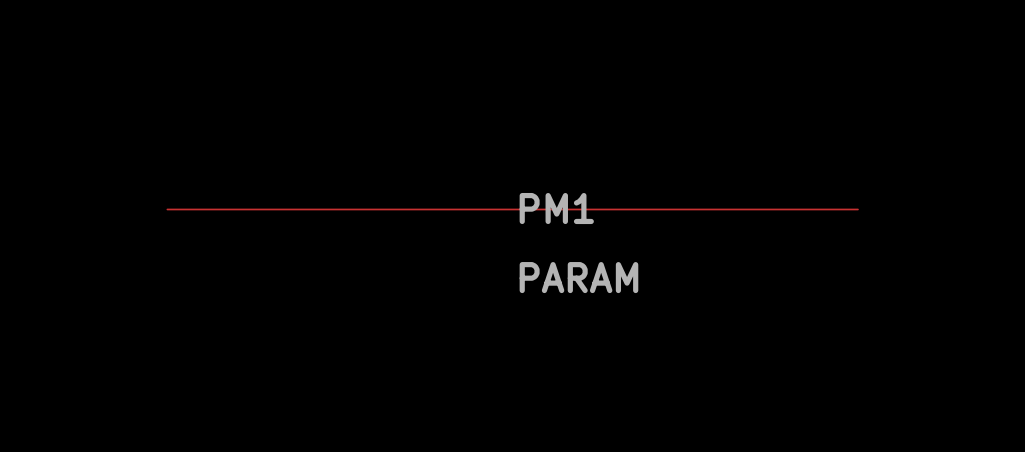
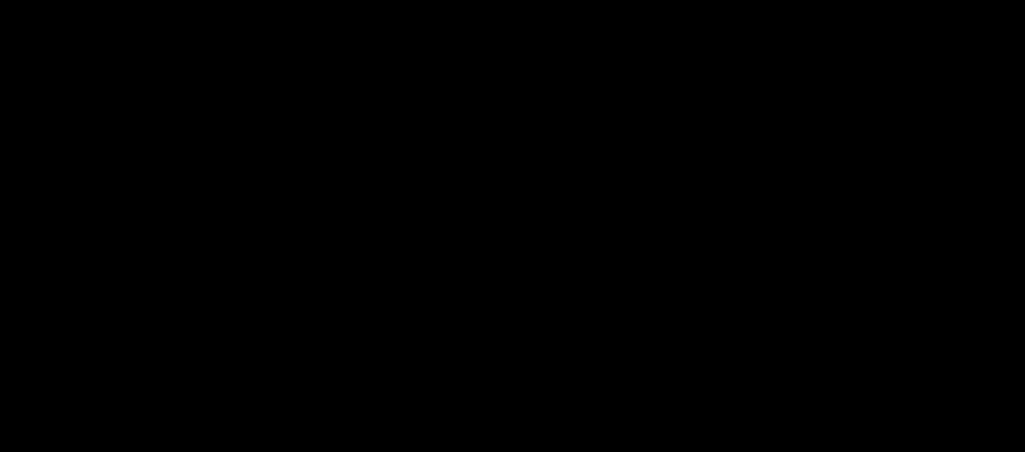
PM1: PARAM (512, 209) -> none

